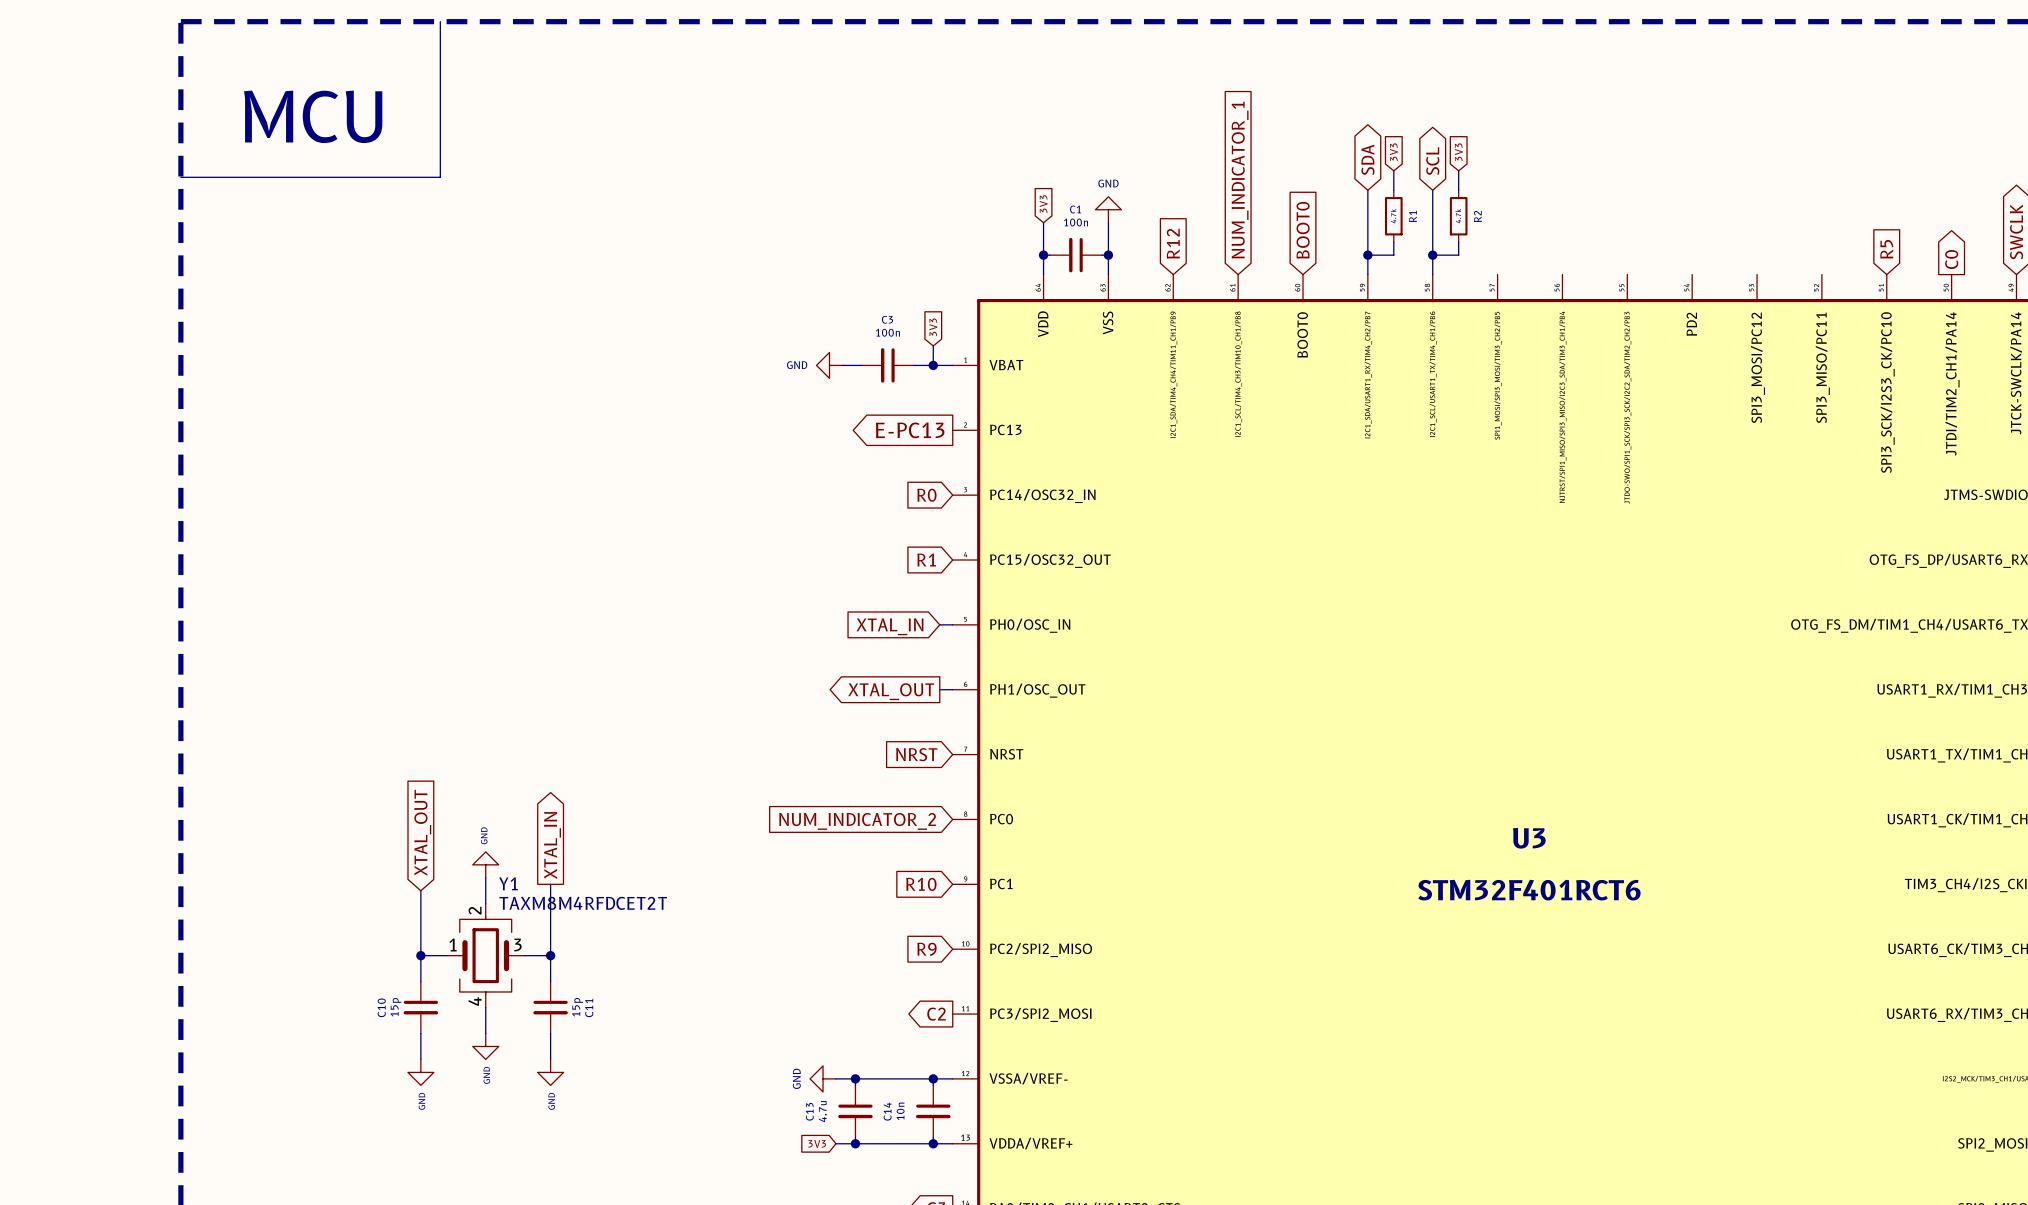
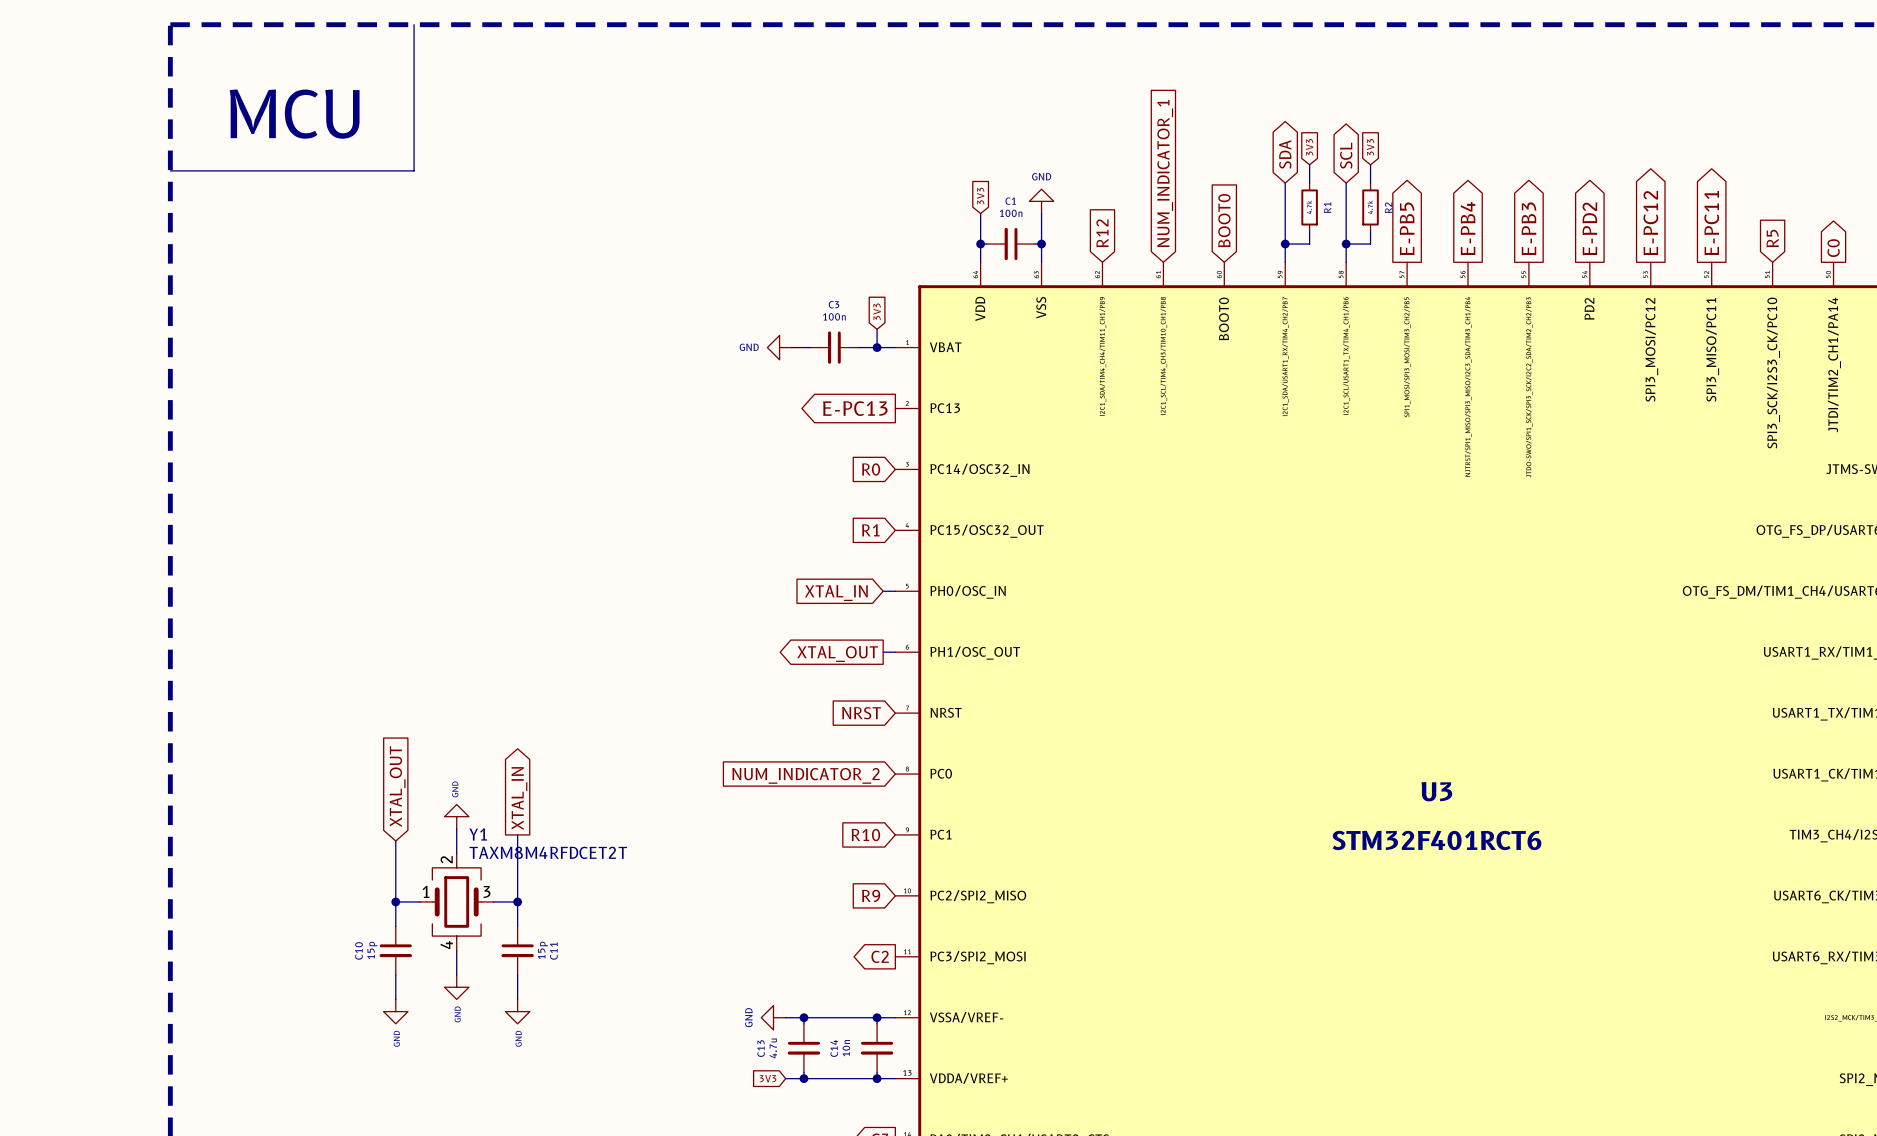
global label: none -> E-PC12 (1650, 223)
global label: none -> E-PC11 (1711, 223)
global label: none -> E-PB4 (1468, 228)
global label: none -> E-PB3 (1528, 228)
global label: none -> E-PD2 (1589, 228)
global label: none -> E-PB5 (1407, 228)

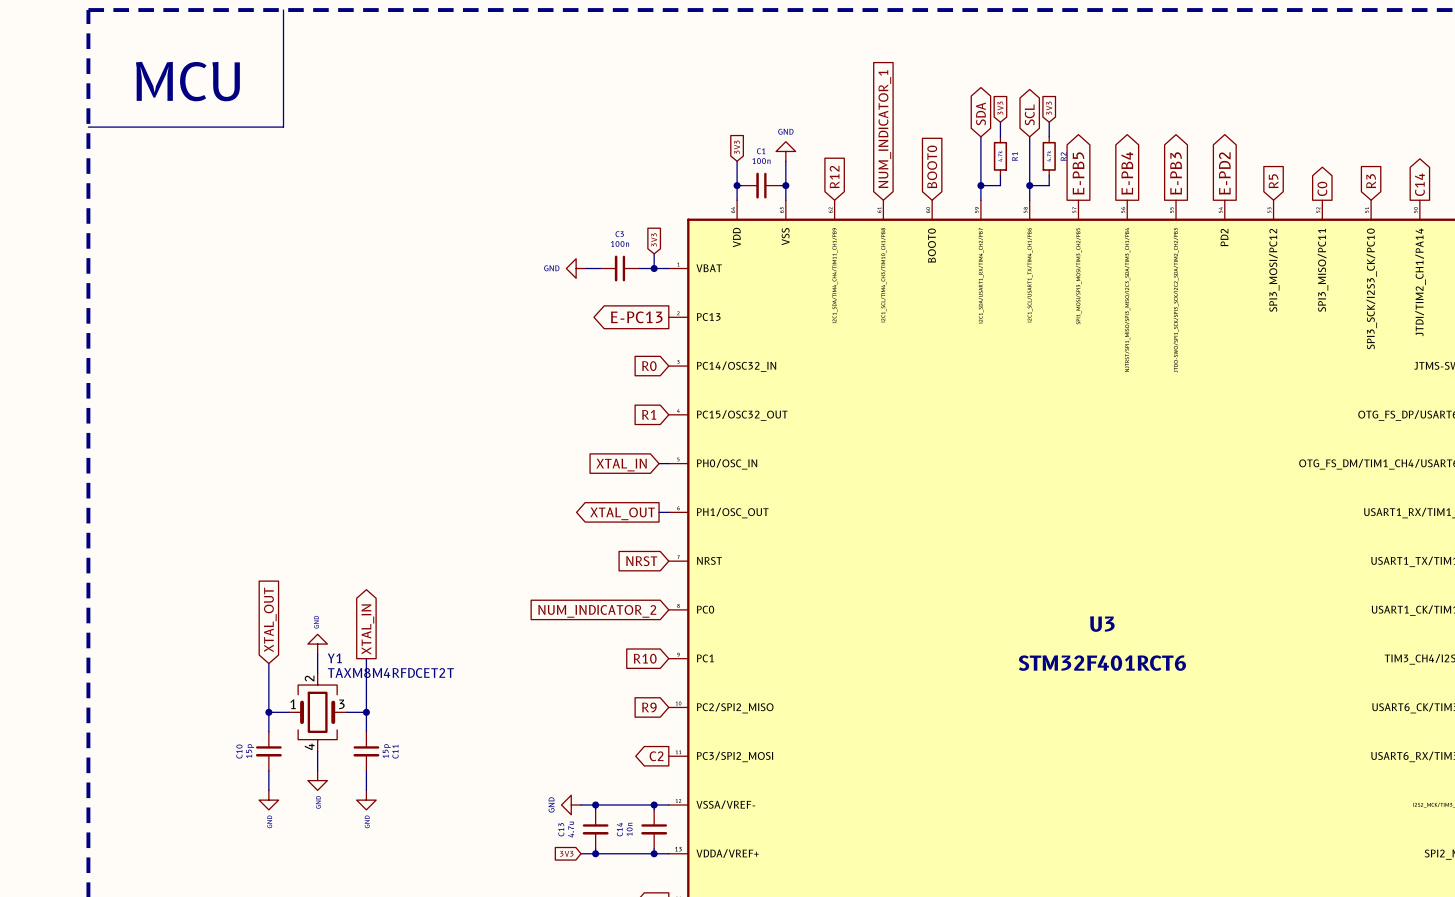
global label shape: output (1650, 223) -> input (1273, 181)
global label: E-PC12 (1650, 223) -> R5 (1273, 181)
global label: E-PC11 (1711, 223) -> C0 (1322, 188)
global label: R5 (1772, 238) -> R3 (1371, 181)
global label: C0 (1833, 248) -> C14 (1419, 184)

